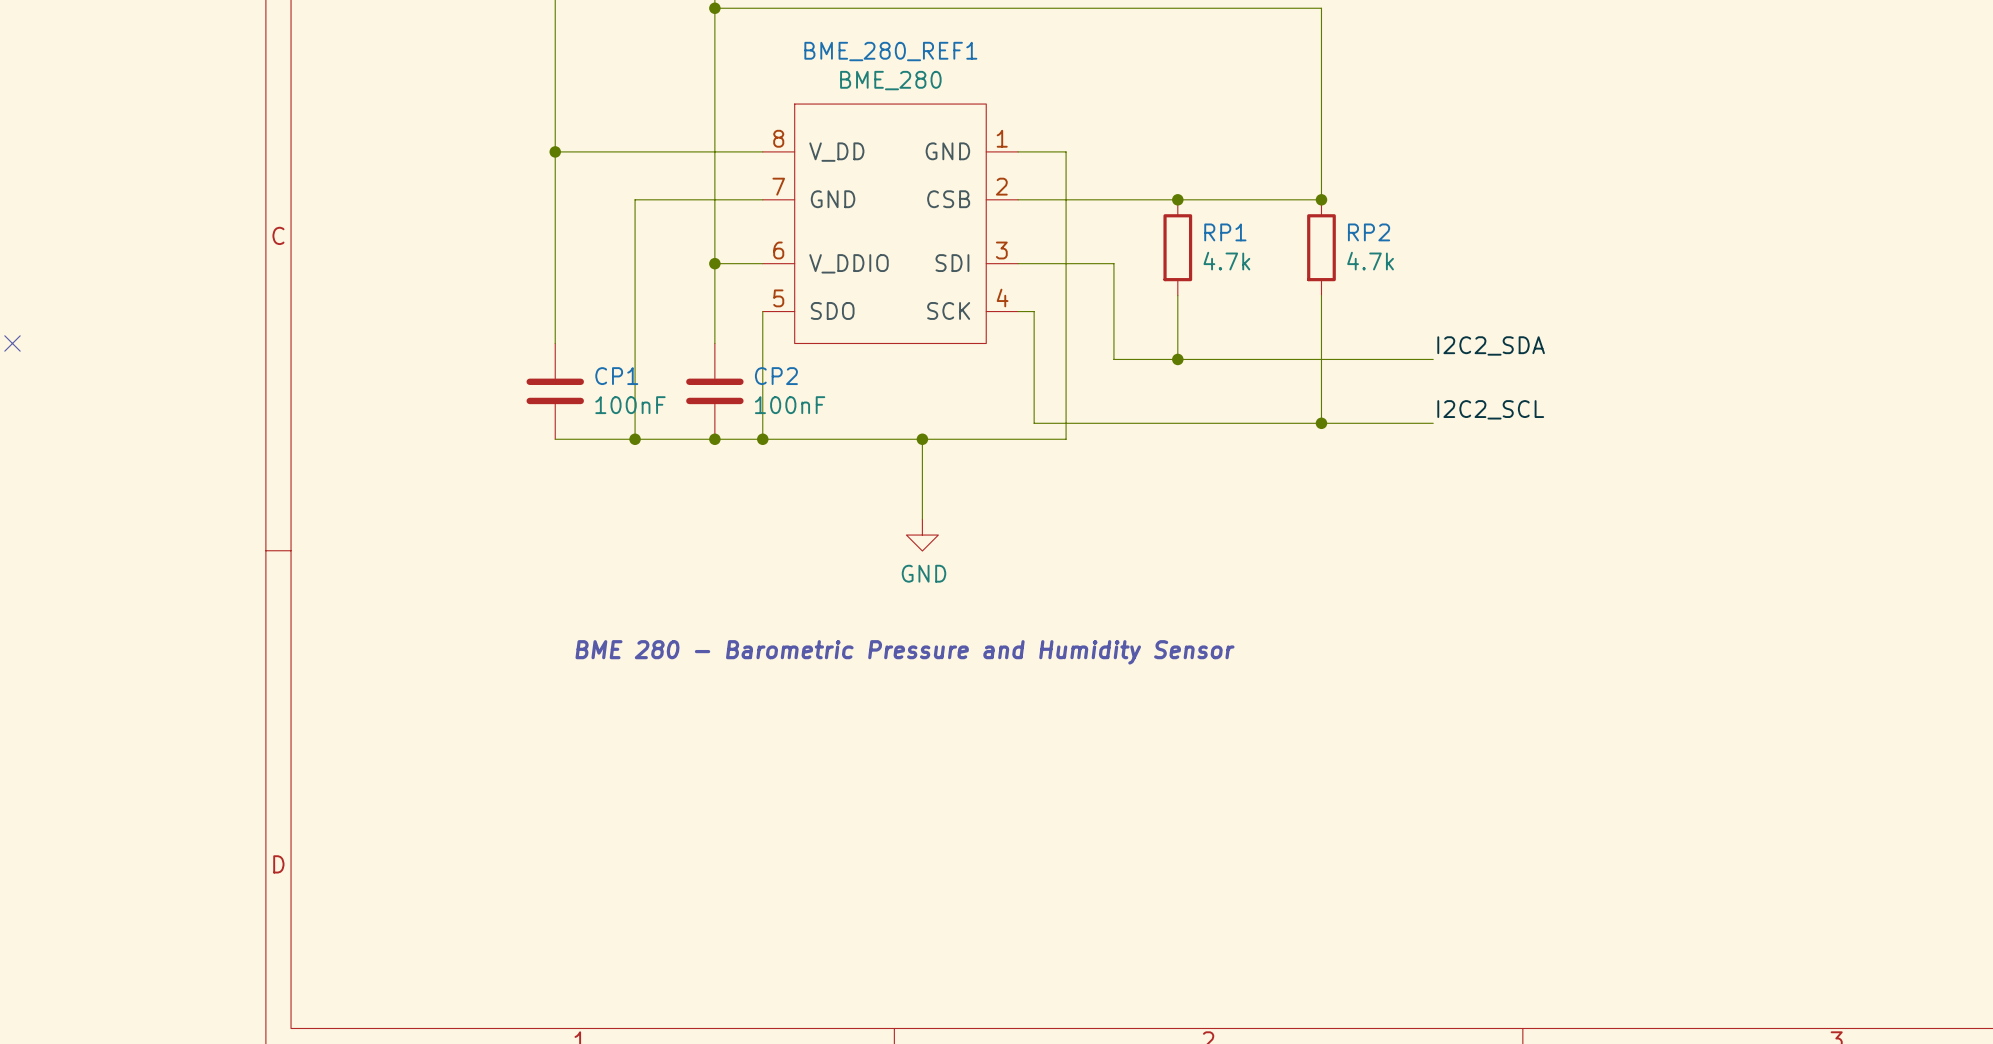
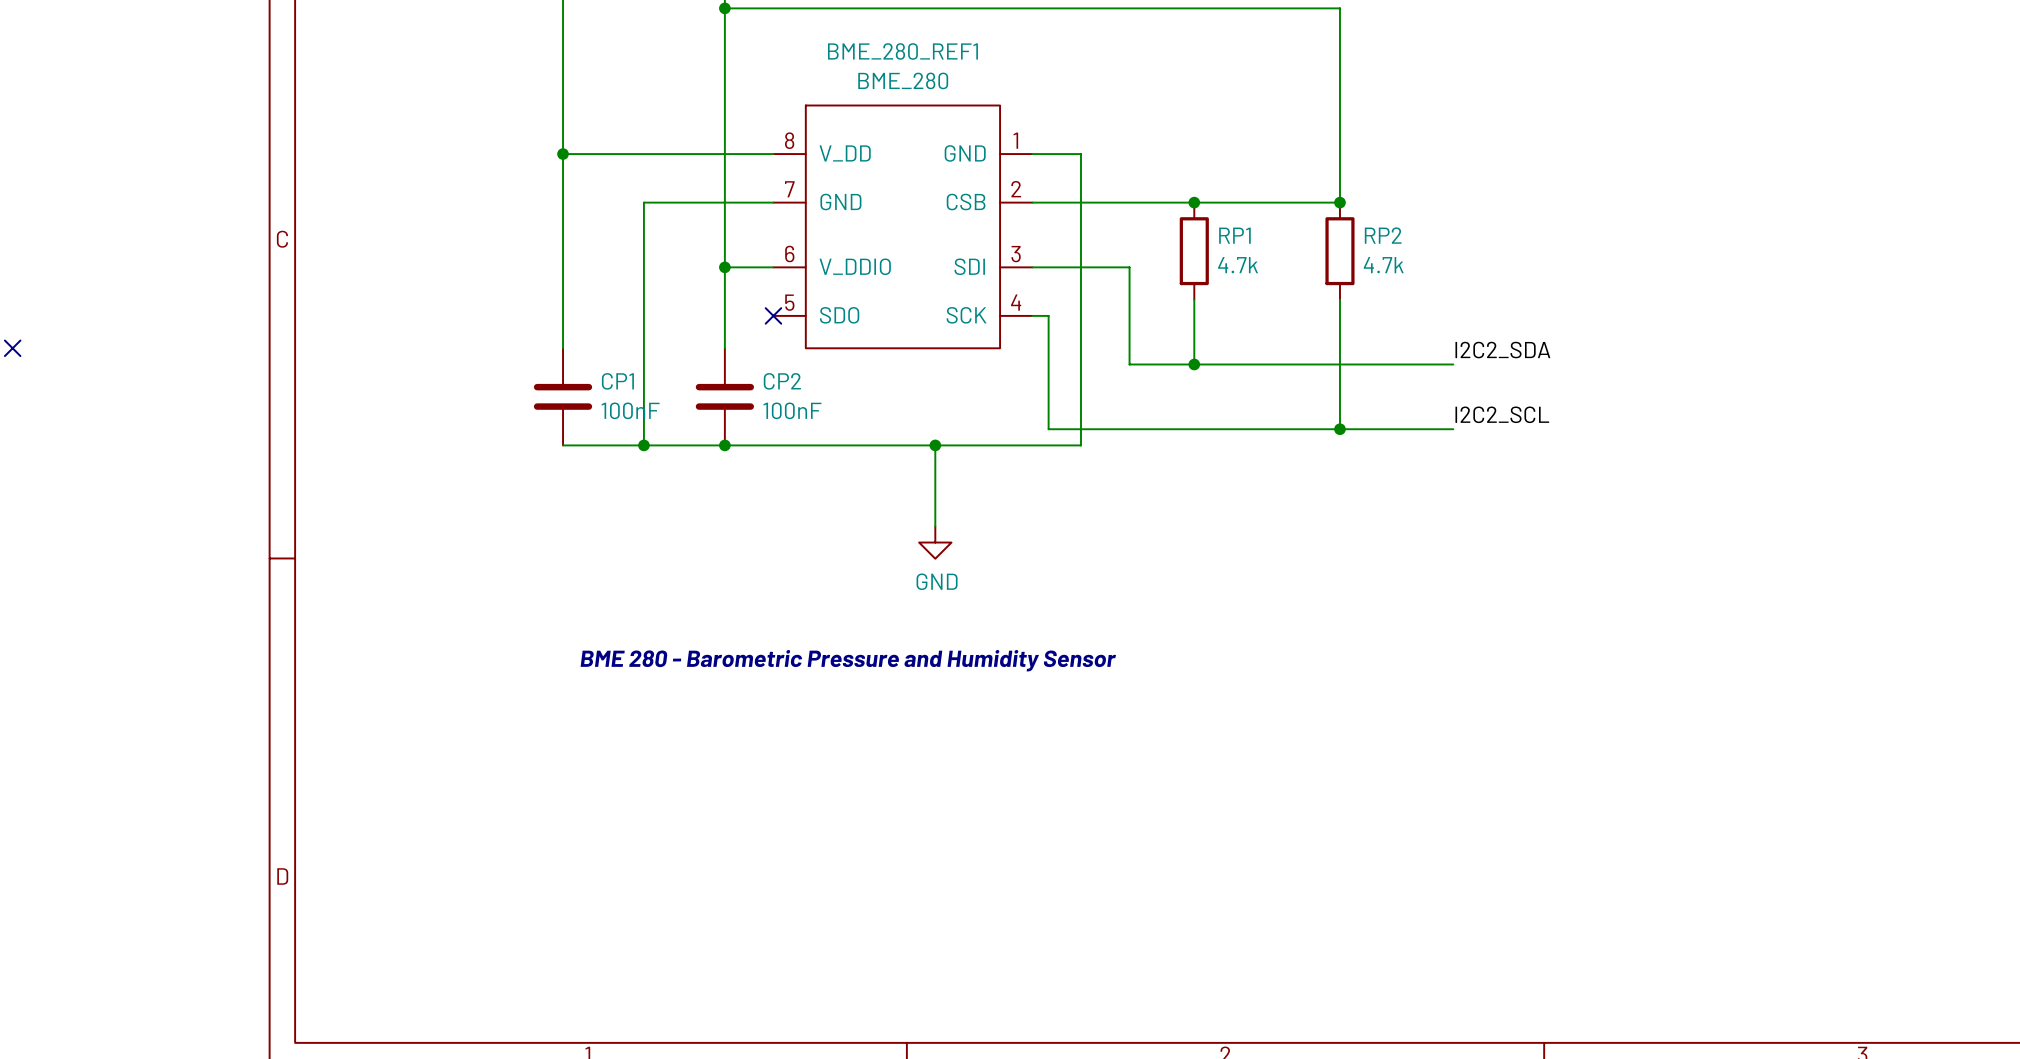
wire: (762, 311) (762, 439) -> none
no-connect mark: none -> (773, 315)
junction: (762, 439) -> none

